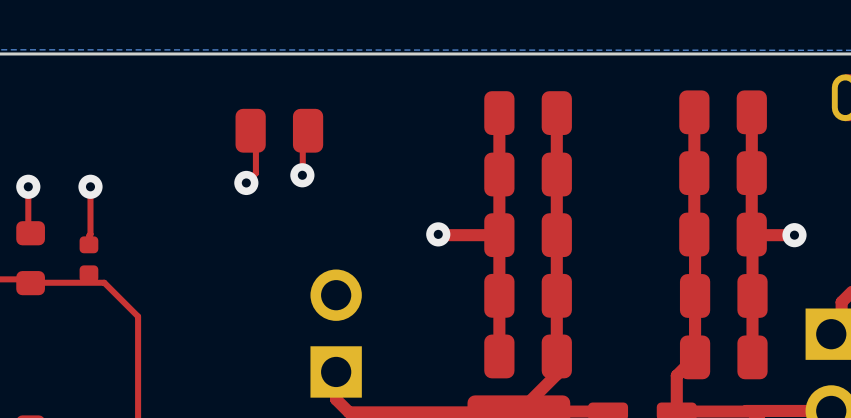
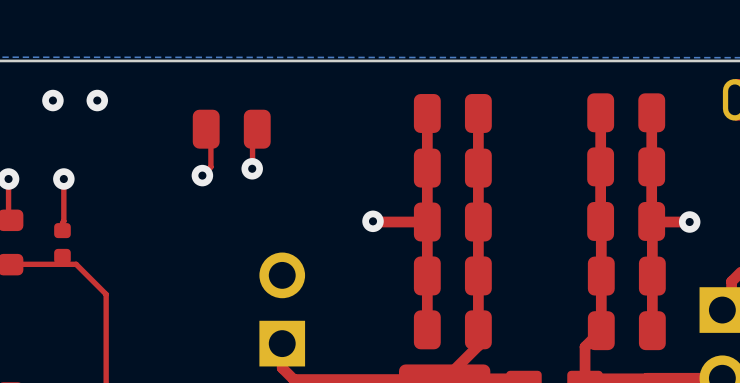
via: none -> (52, 100)
via: none -> (97, 100)

